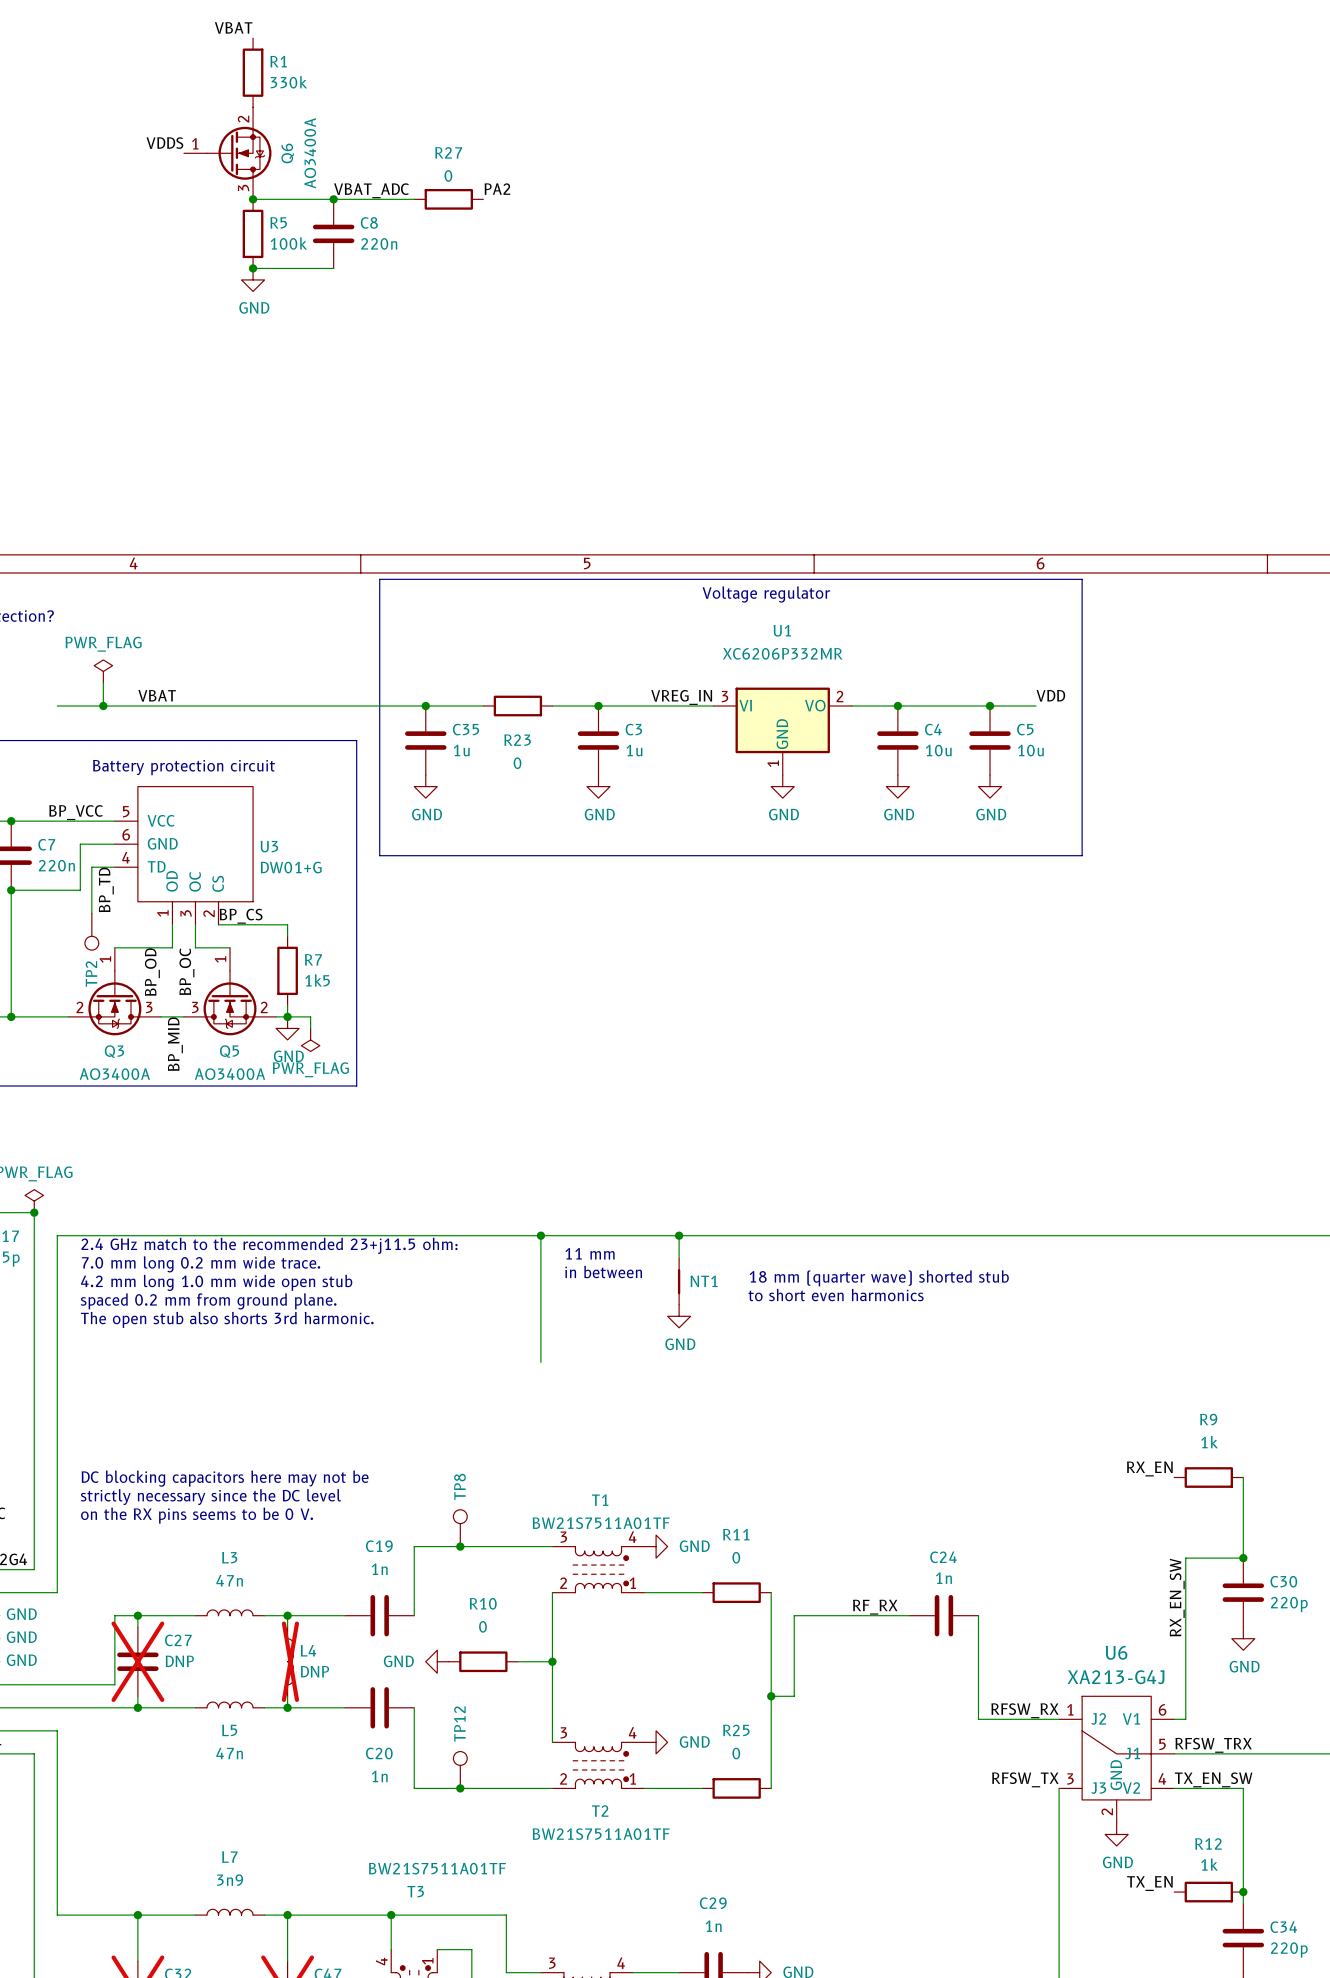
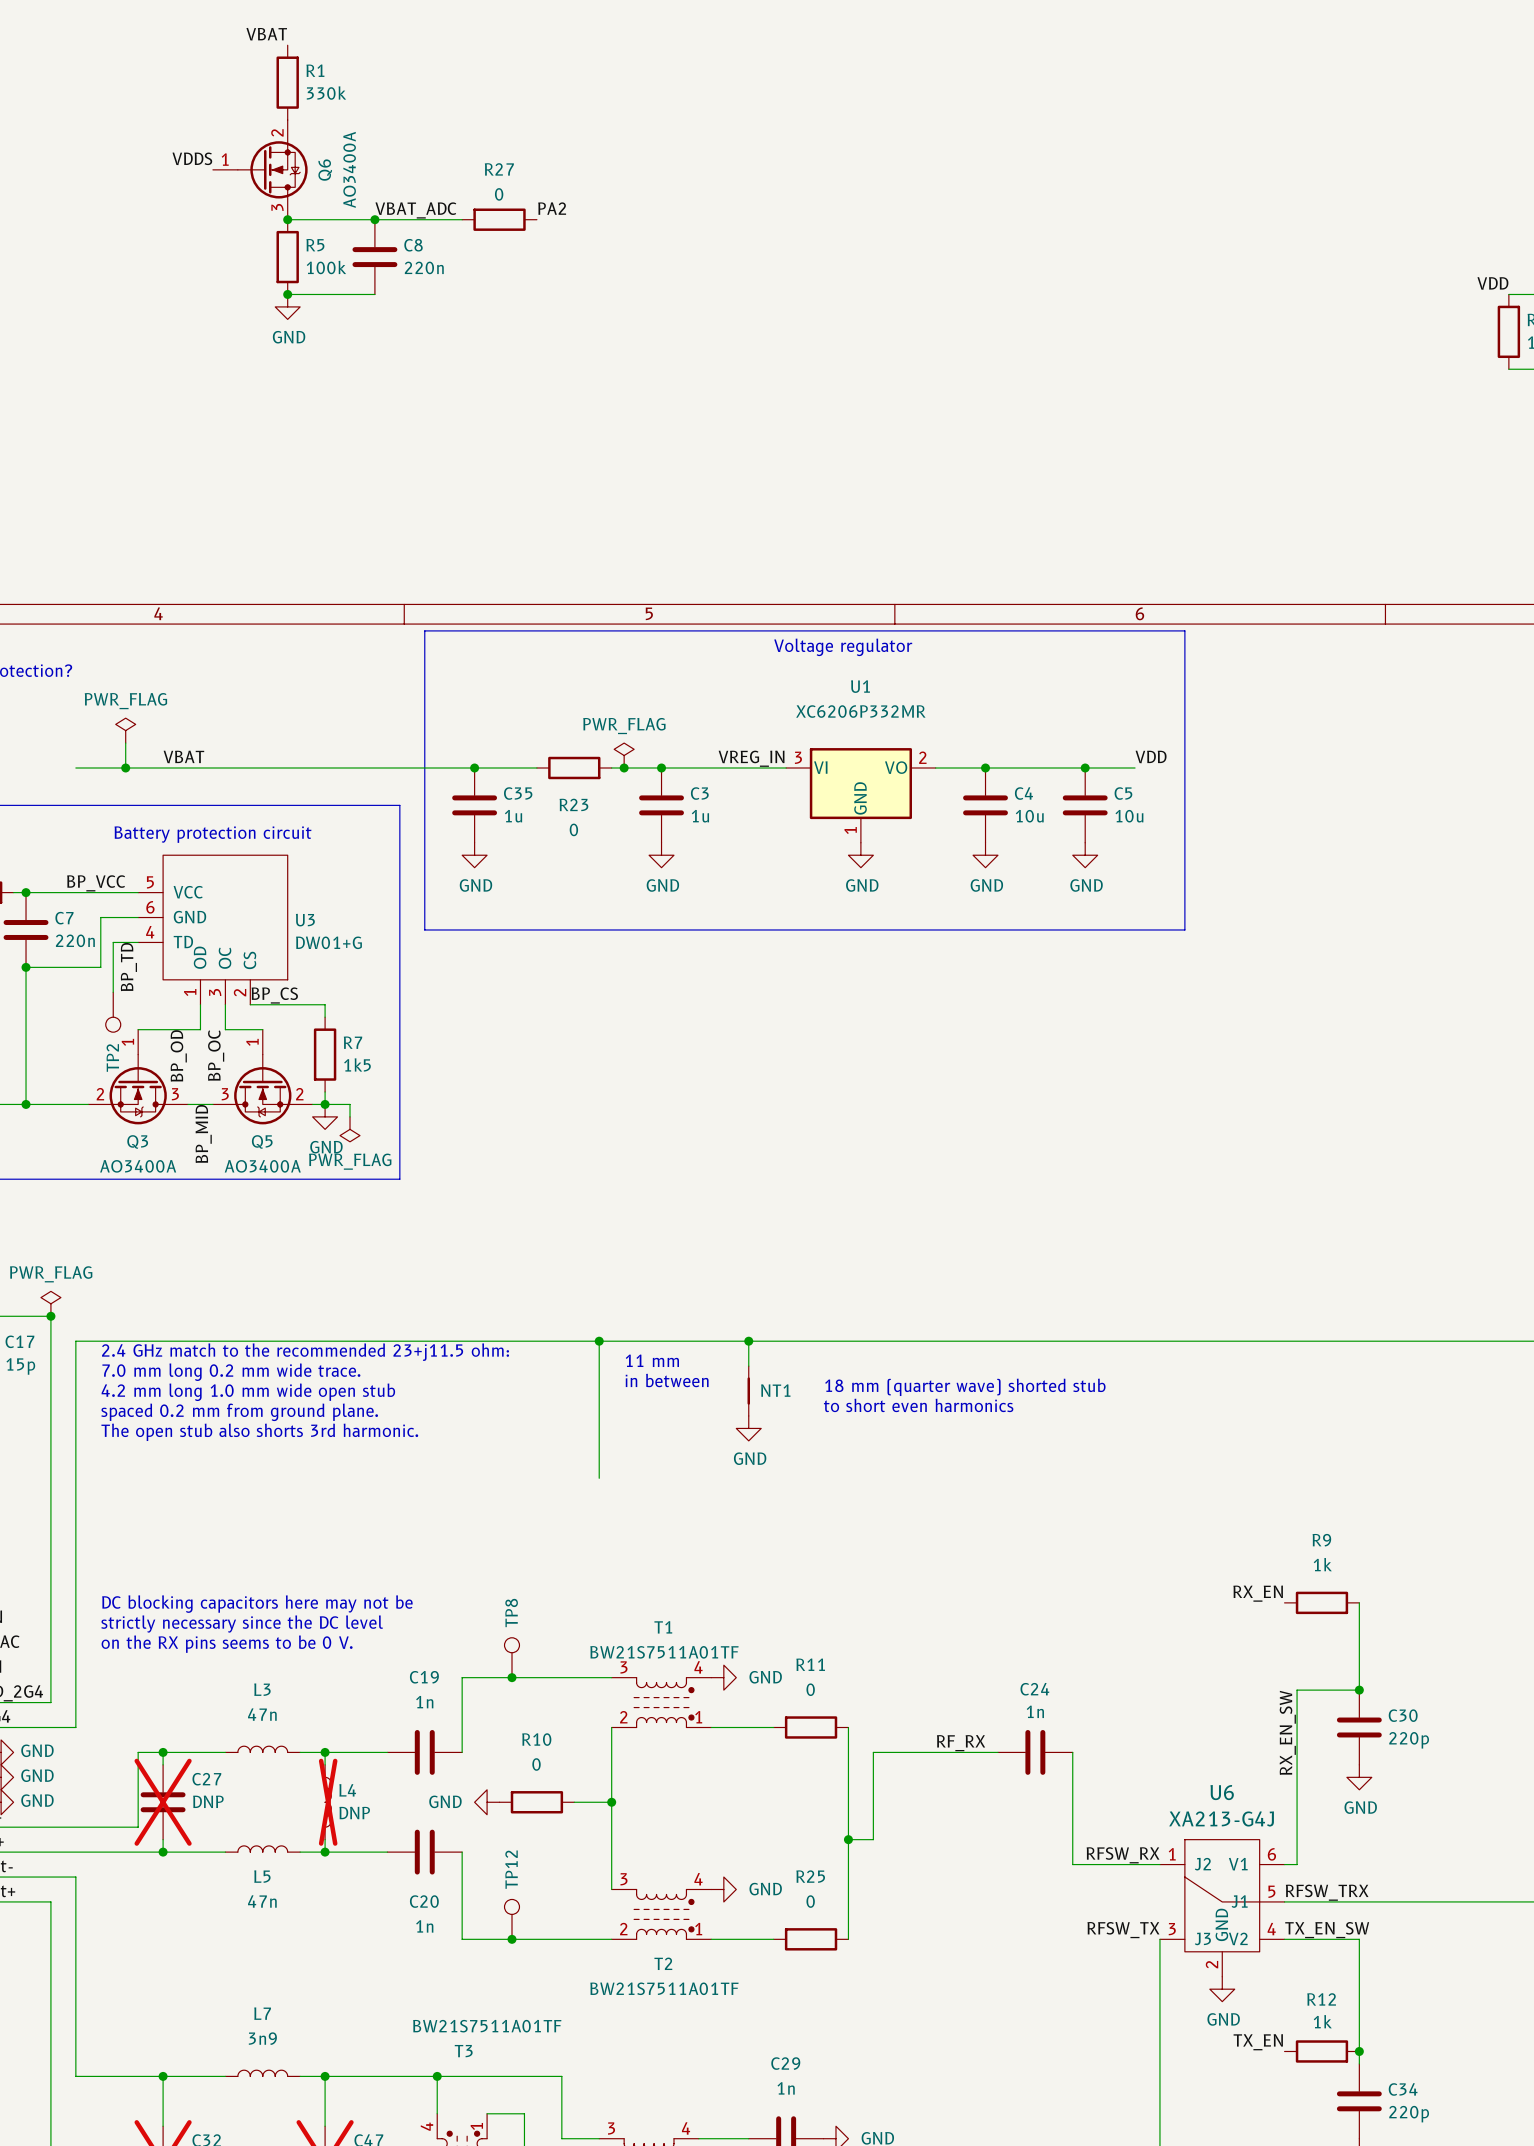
power symbol: none -> PWR_FLAG (624, 755)
junction: none -> (624, 767)

